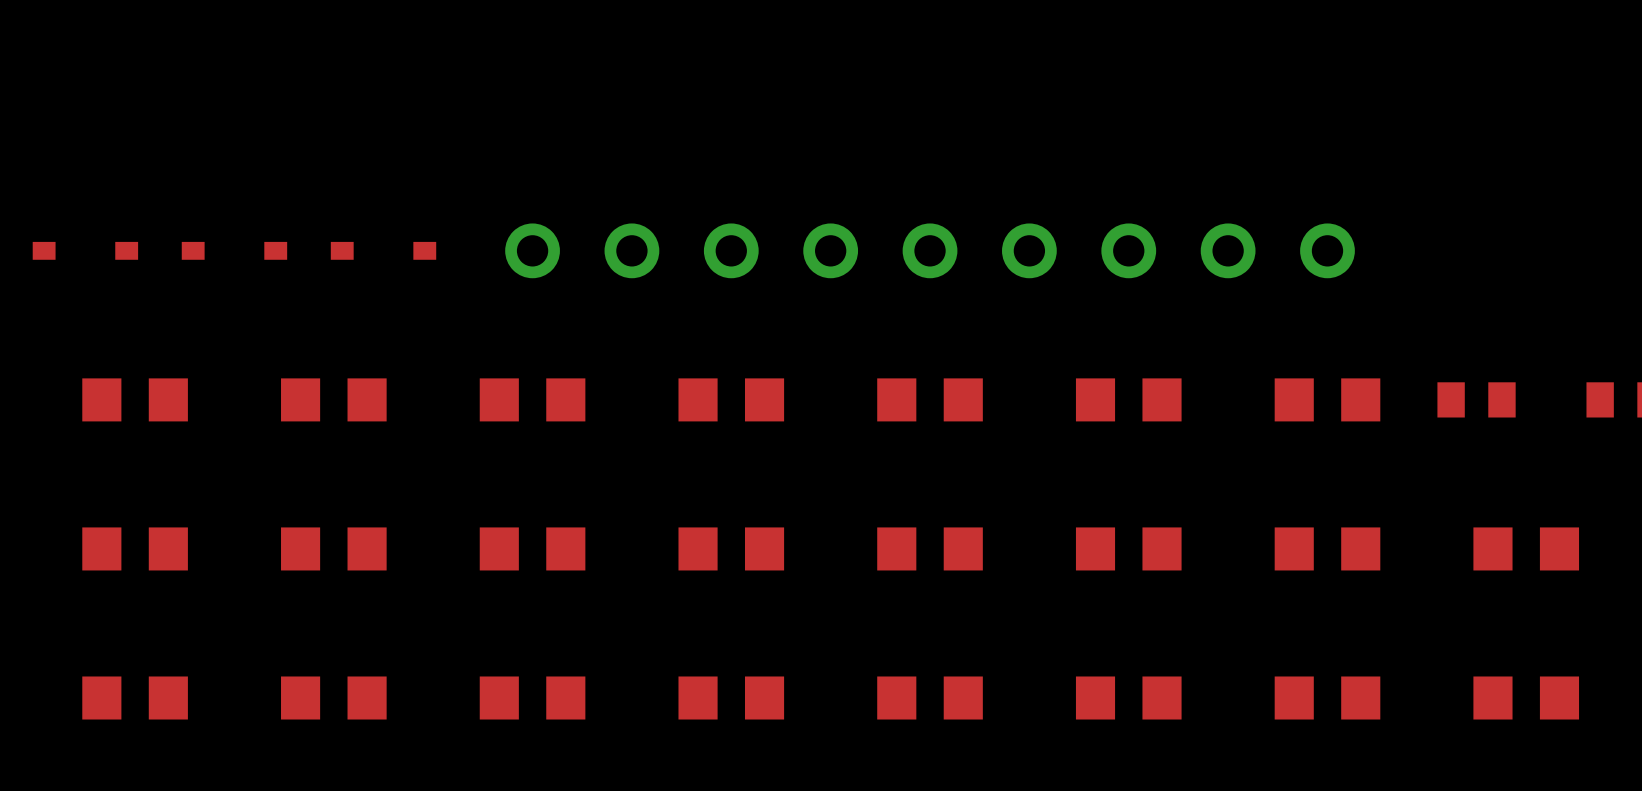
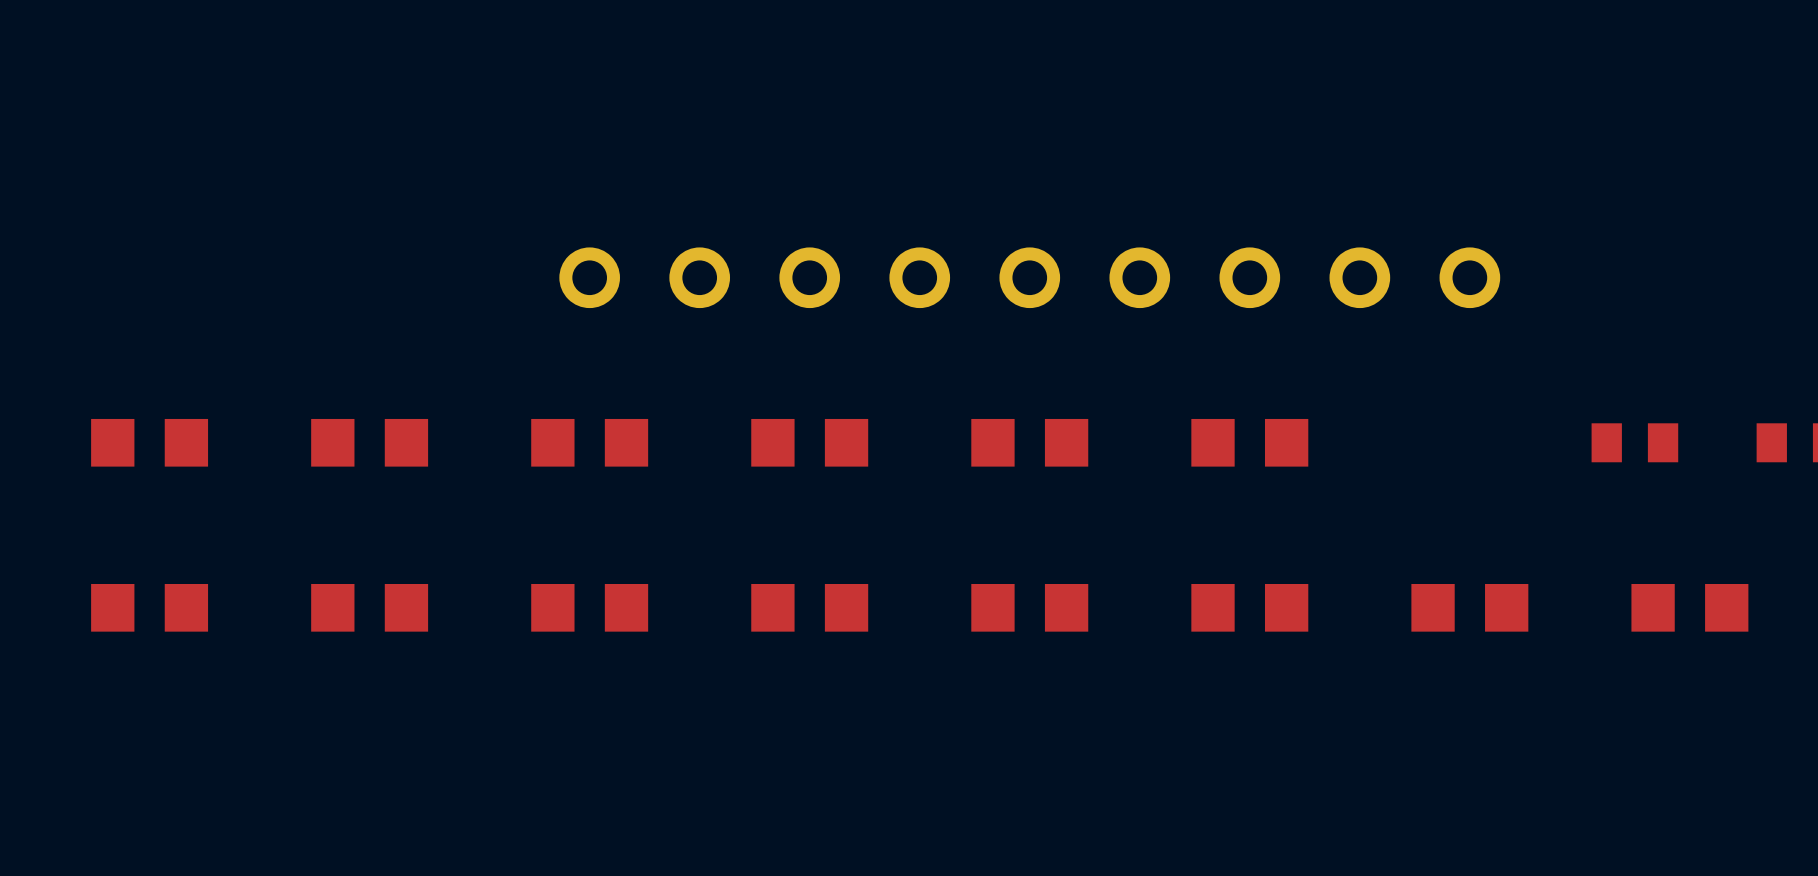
part: (85, 250) -> none
part: (234, 250) -> none
part: (383, 250) -> none
part: (1327, 399) -> none
part: (135, 697) -> none
part: (333, 697) -> none
part: (532, 697) -> none
part: (731, 697) -> none
part: (930, 697) -> none
part: (1128, 697) -> none
part: (1327, 697) -> none
part: (1526, 697) -> none

